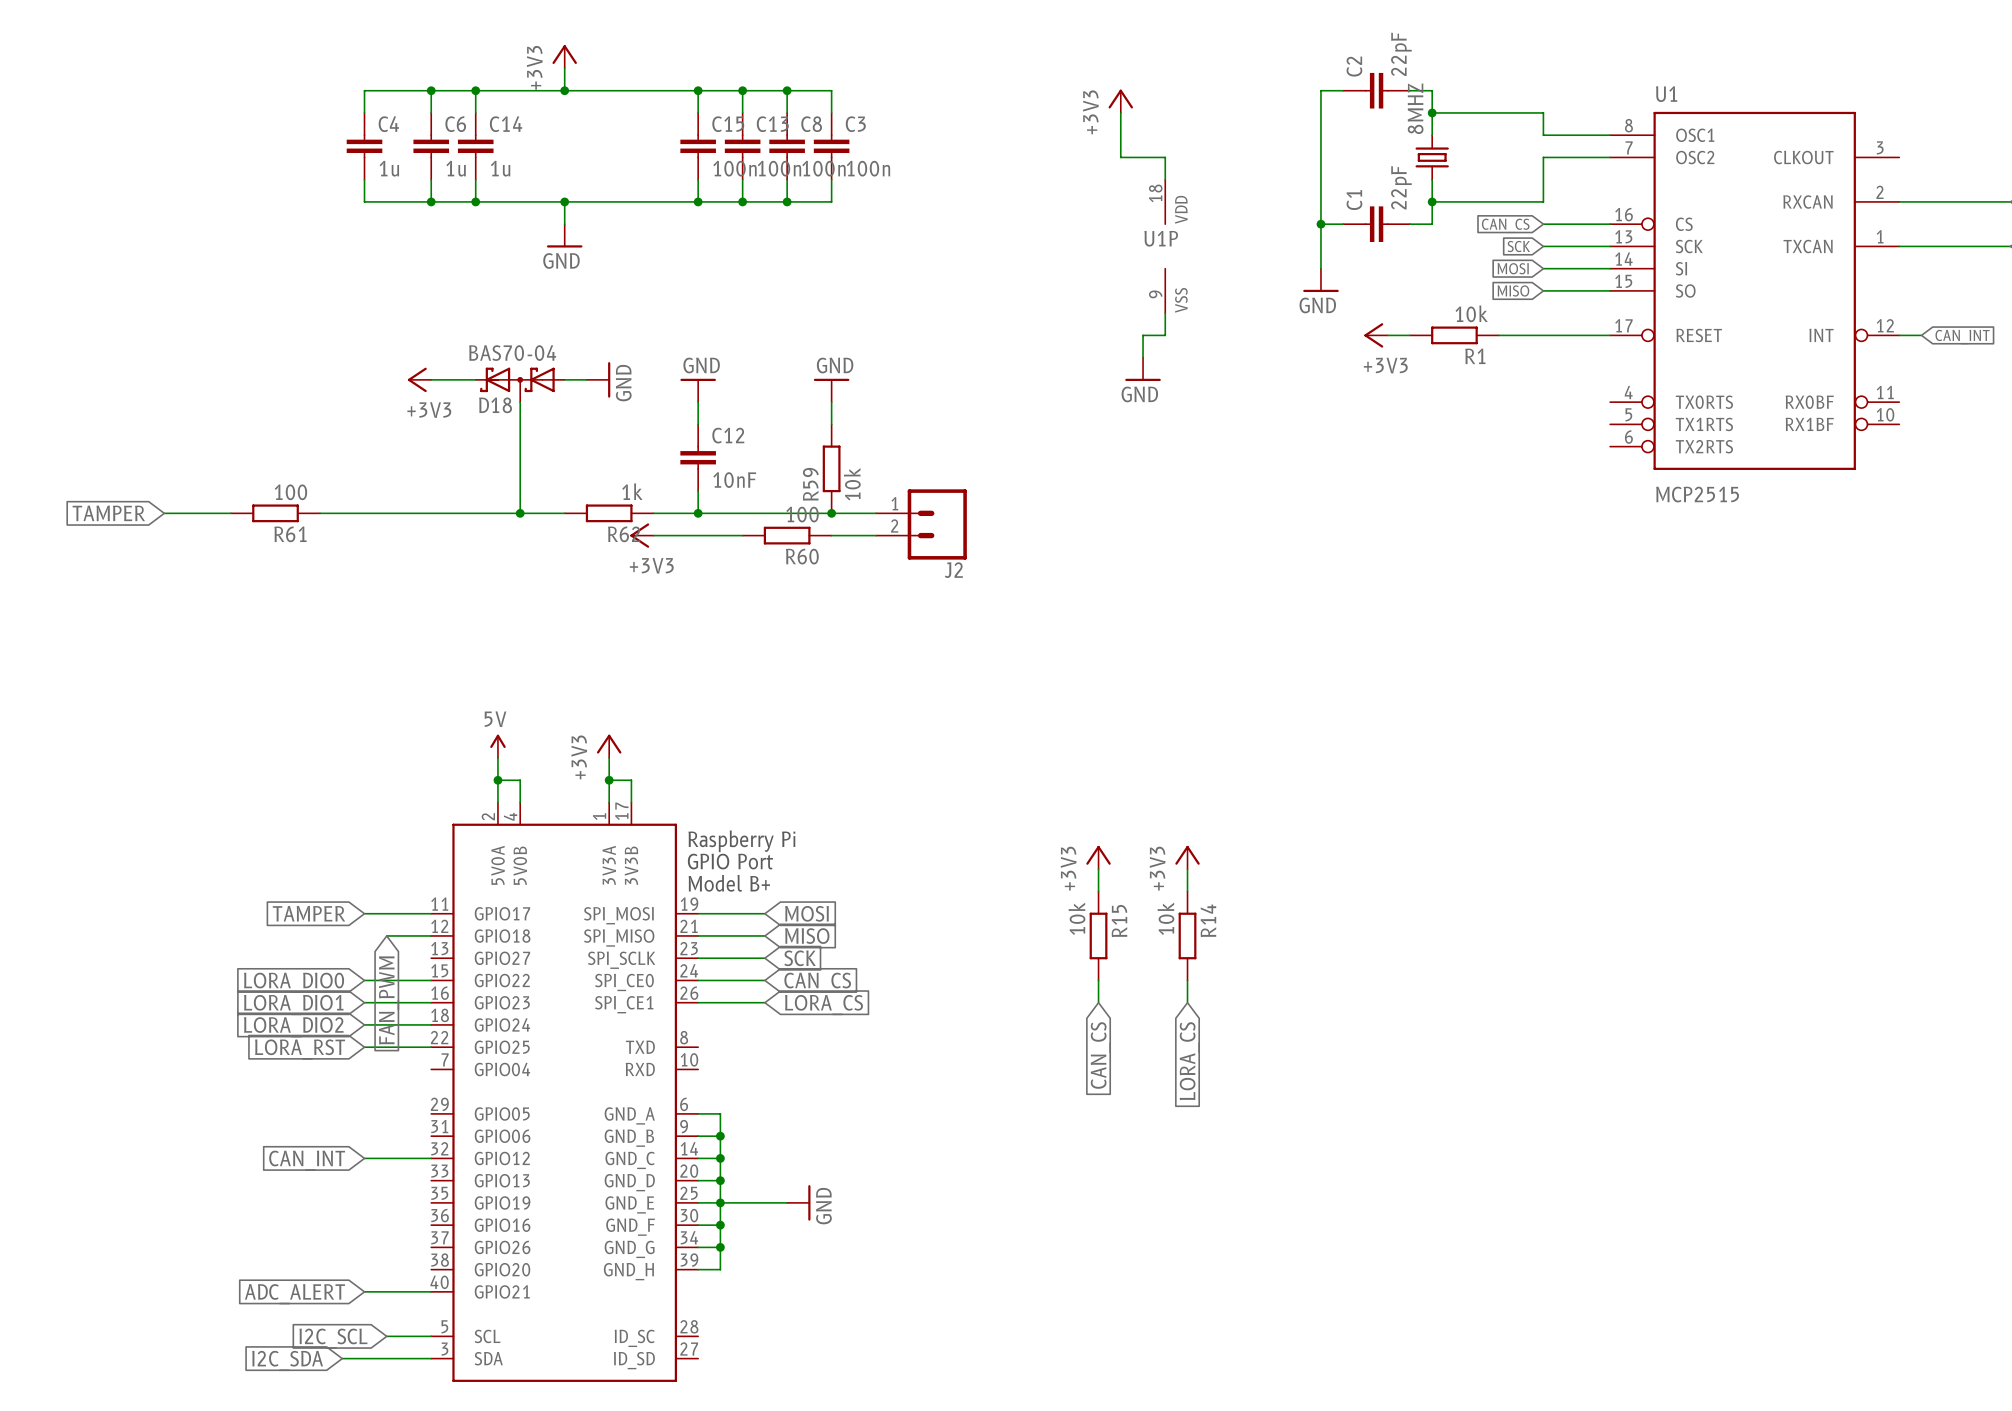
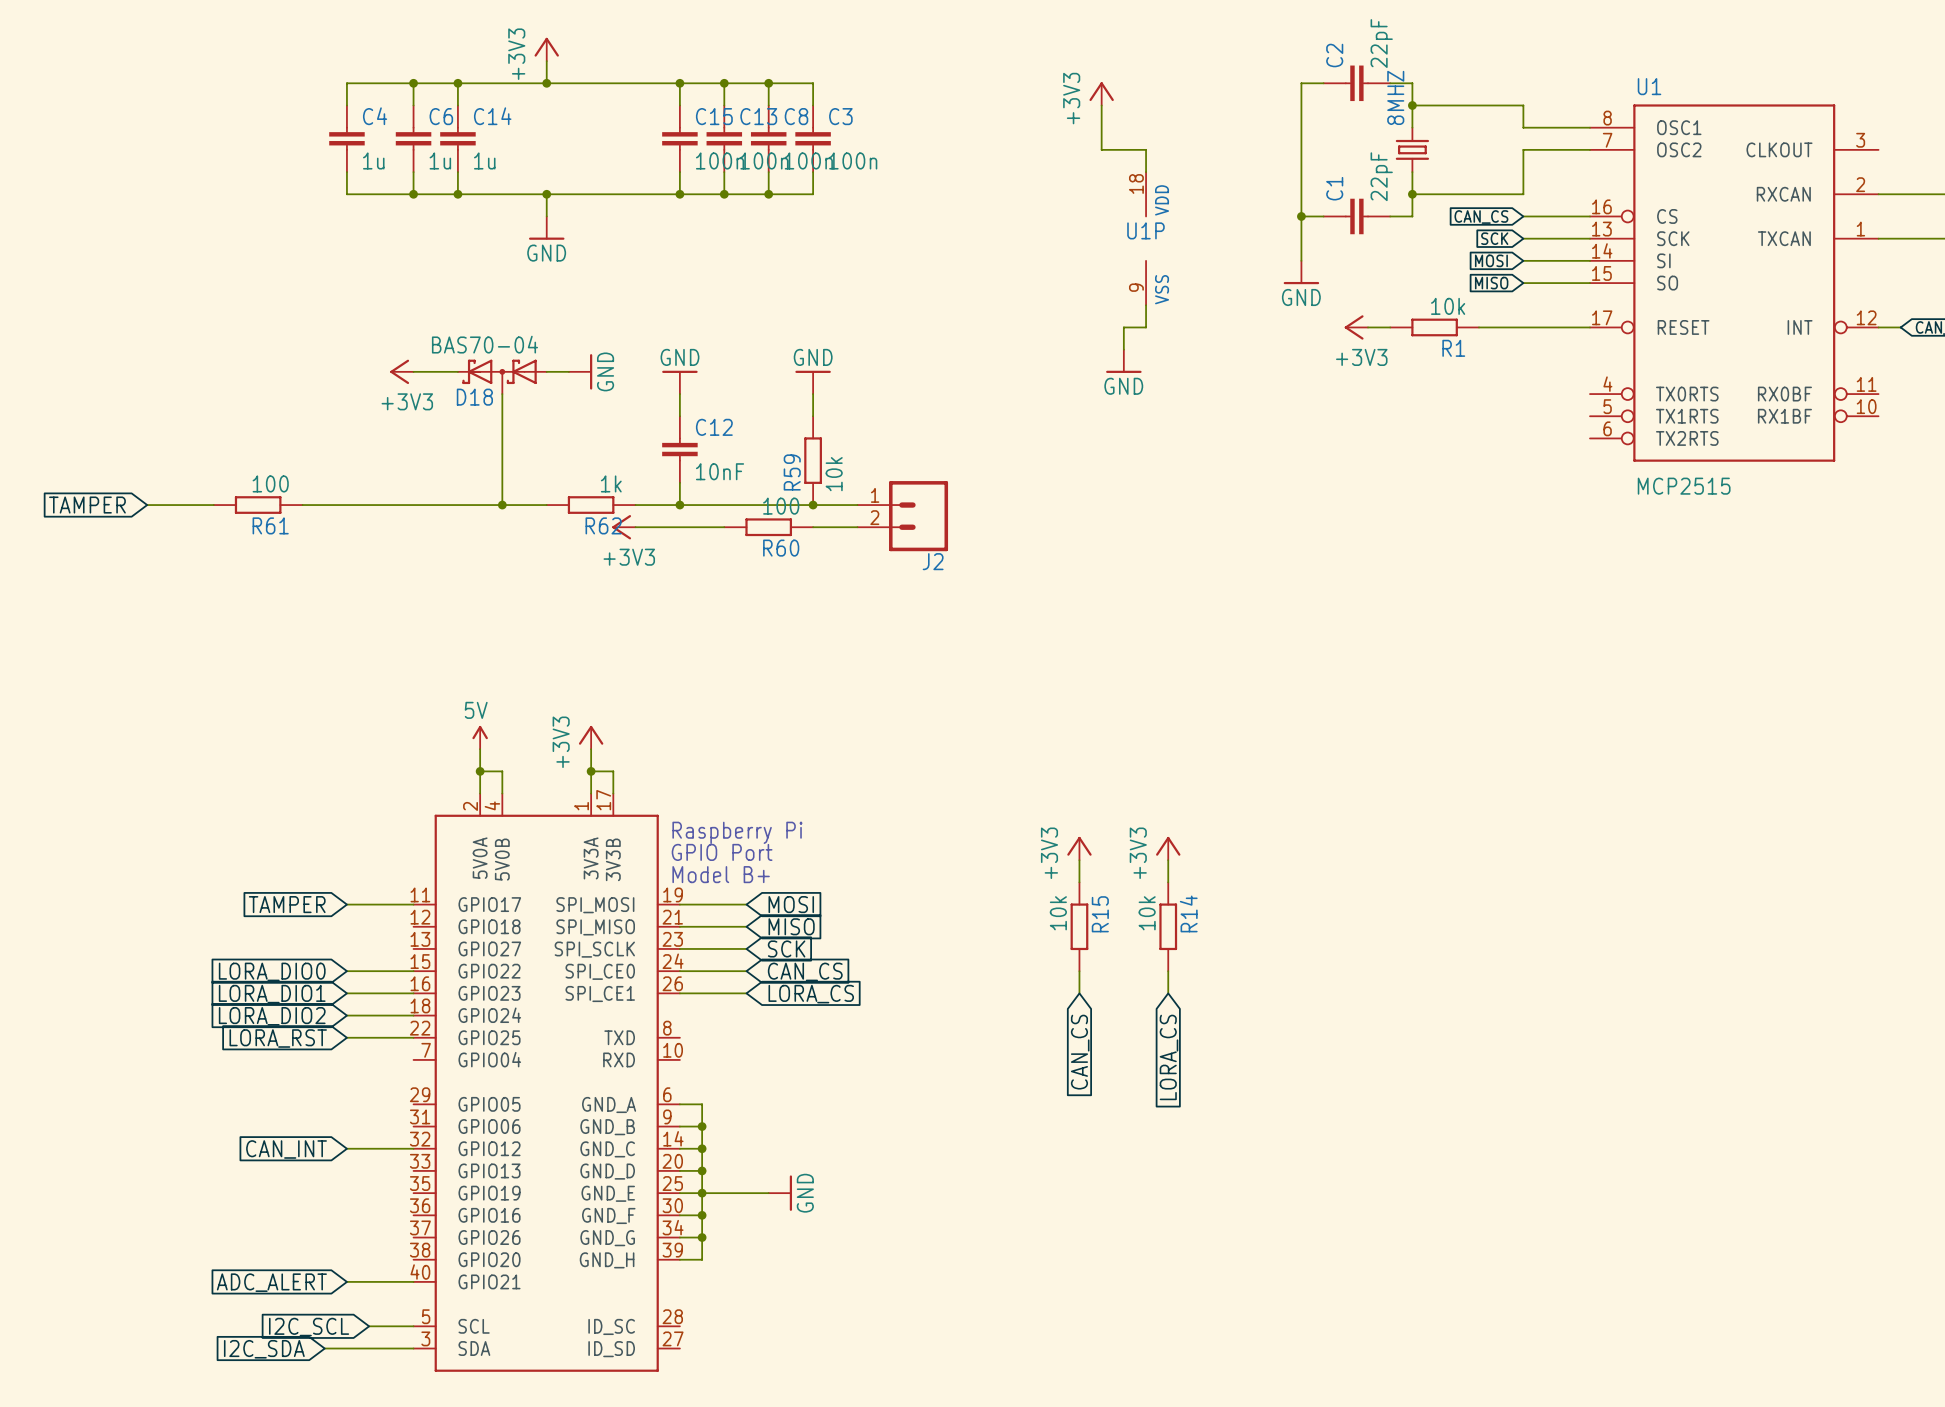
wire: (386, 935) (431, 935) -> none
global label: FAN_PWM (389, 1000) -> none

